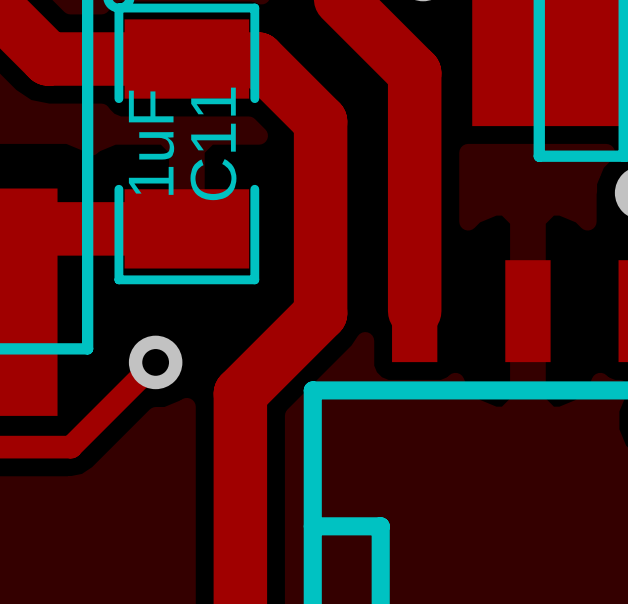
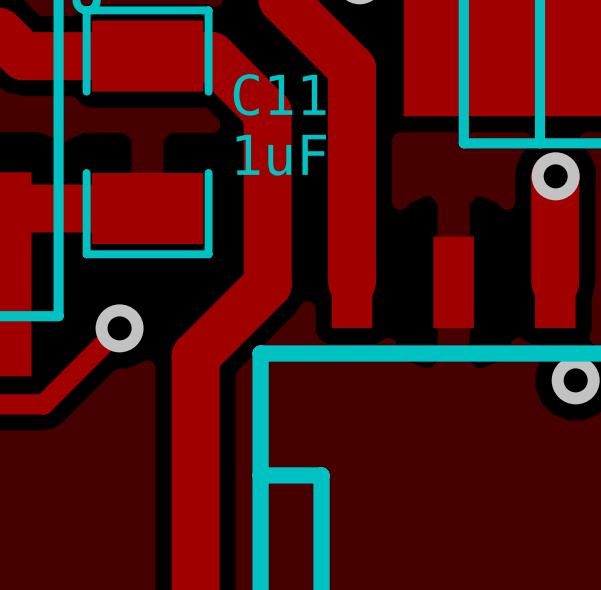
C11 value rotation: 0° (151, 142) -> 90° clockwise (281, 155)
C11 value position: 1uF (151, 142) -> 1uF (281, 155)
C11 name rotation: 0° (213, 143) -> 90° clockwise (279, 94)

